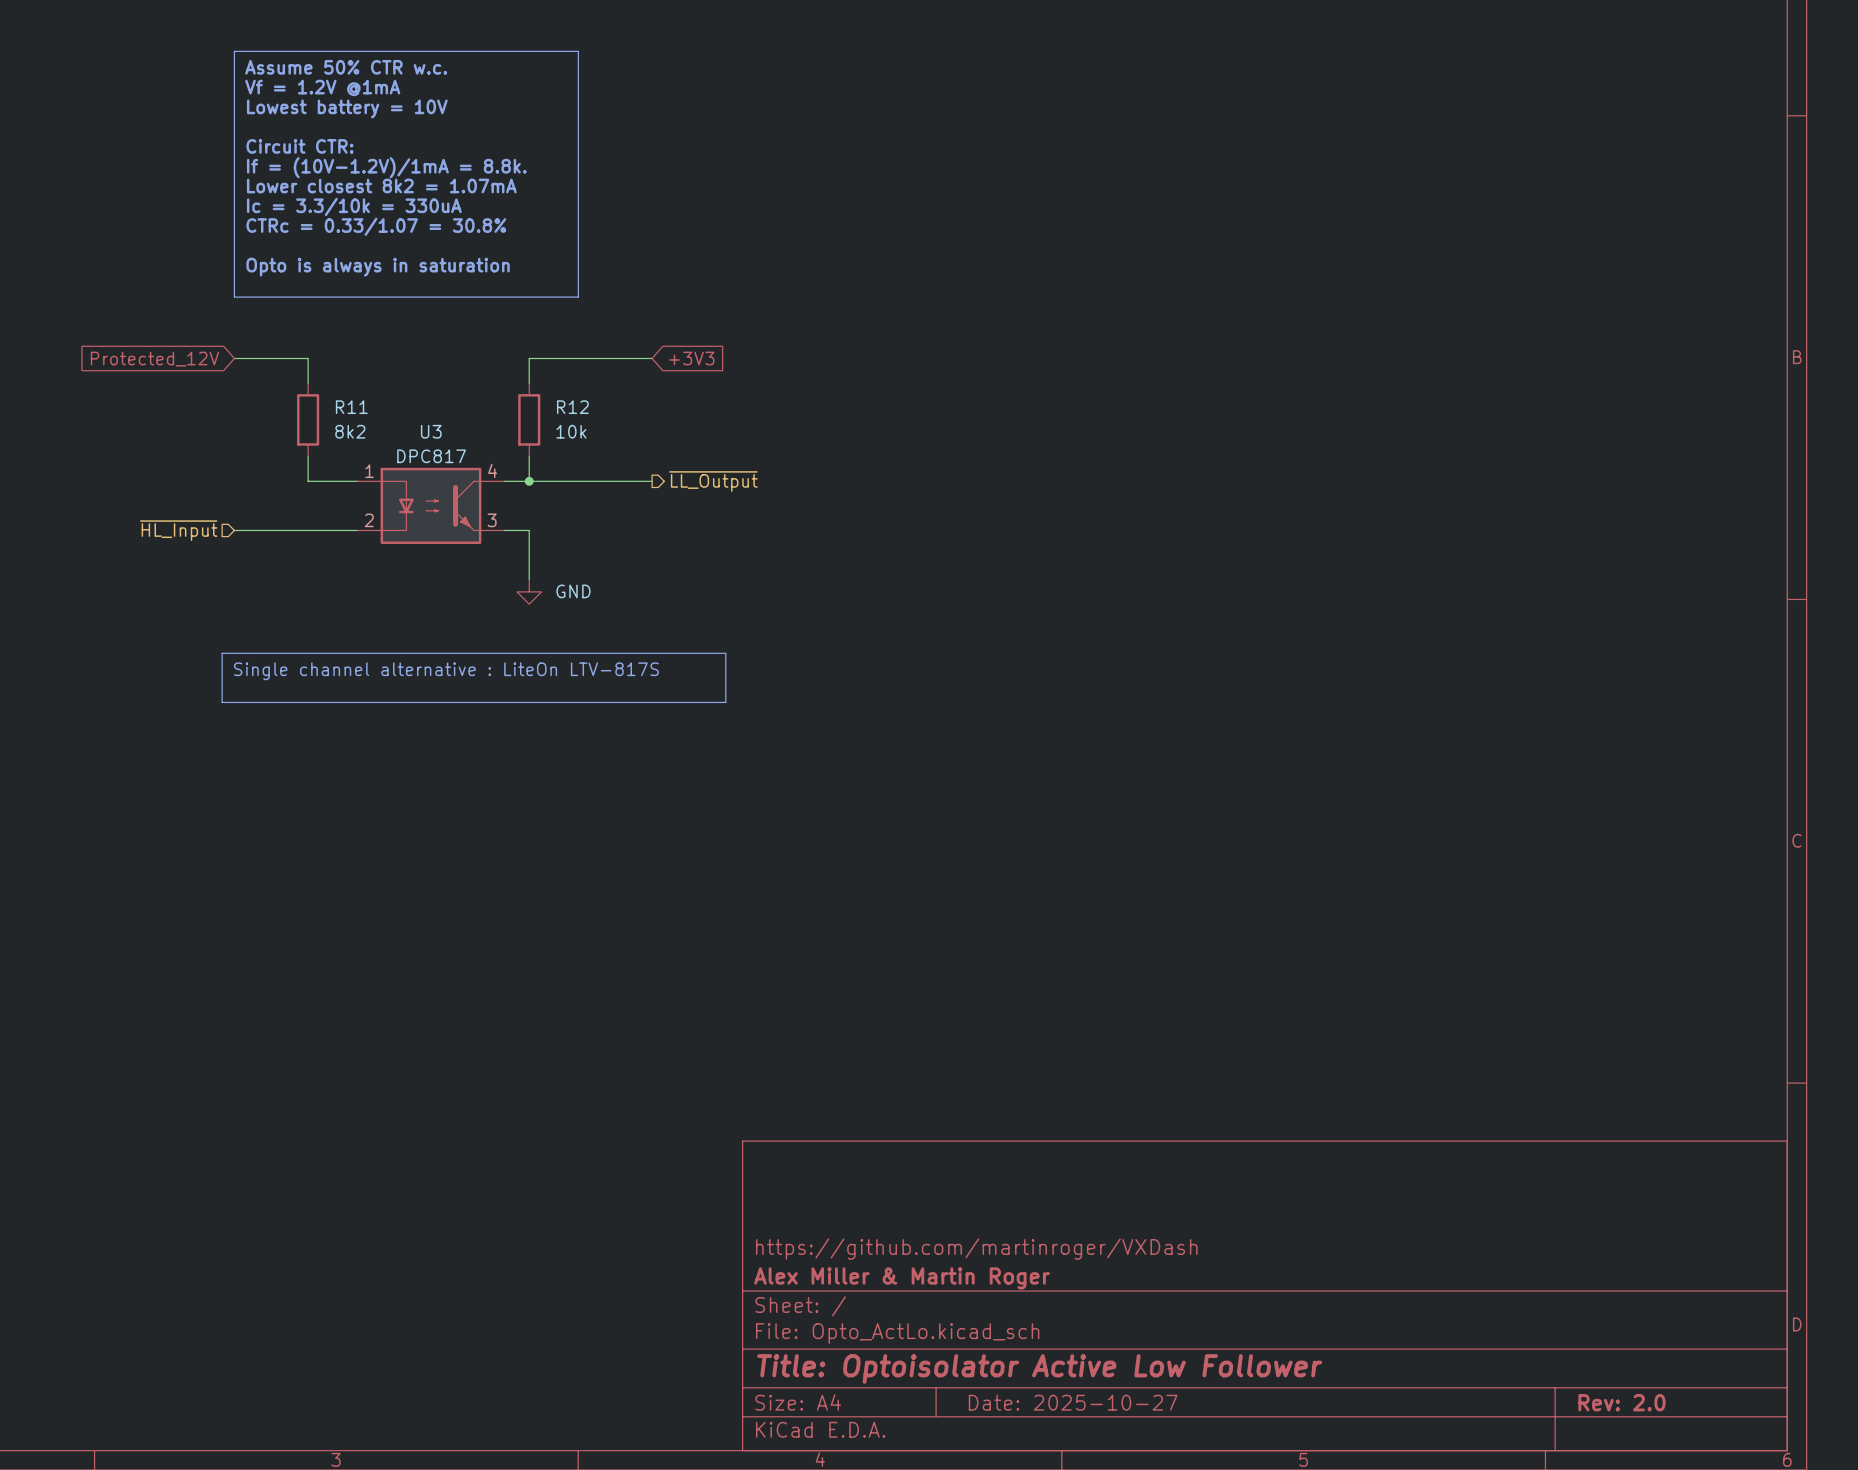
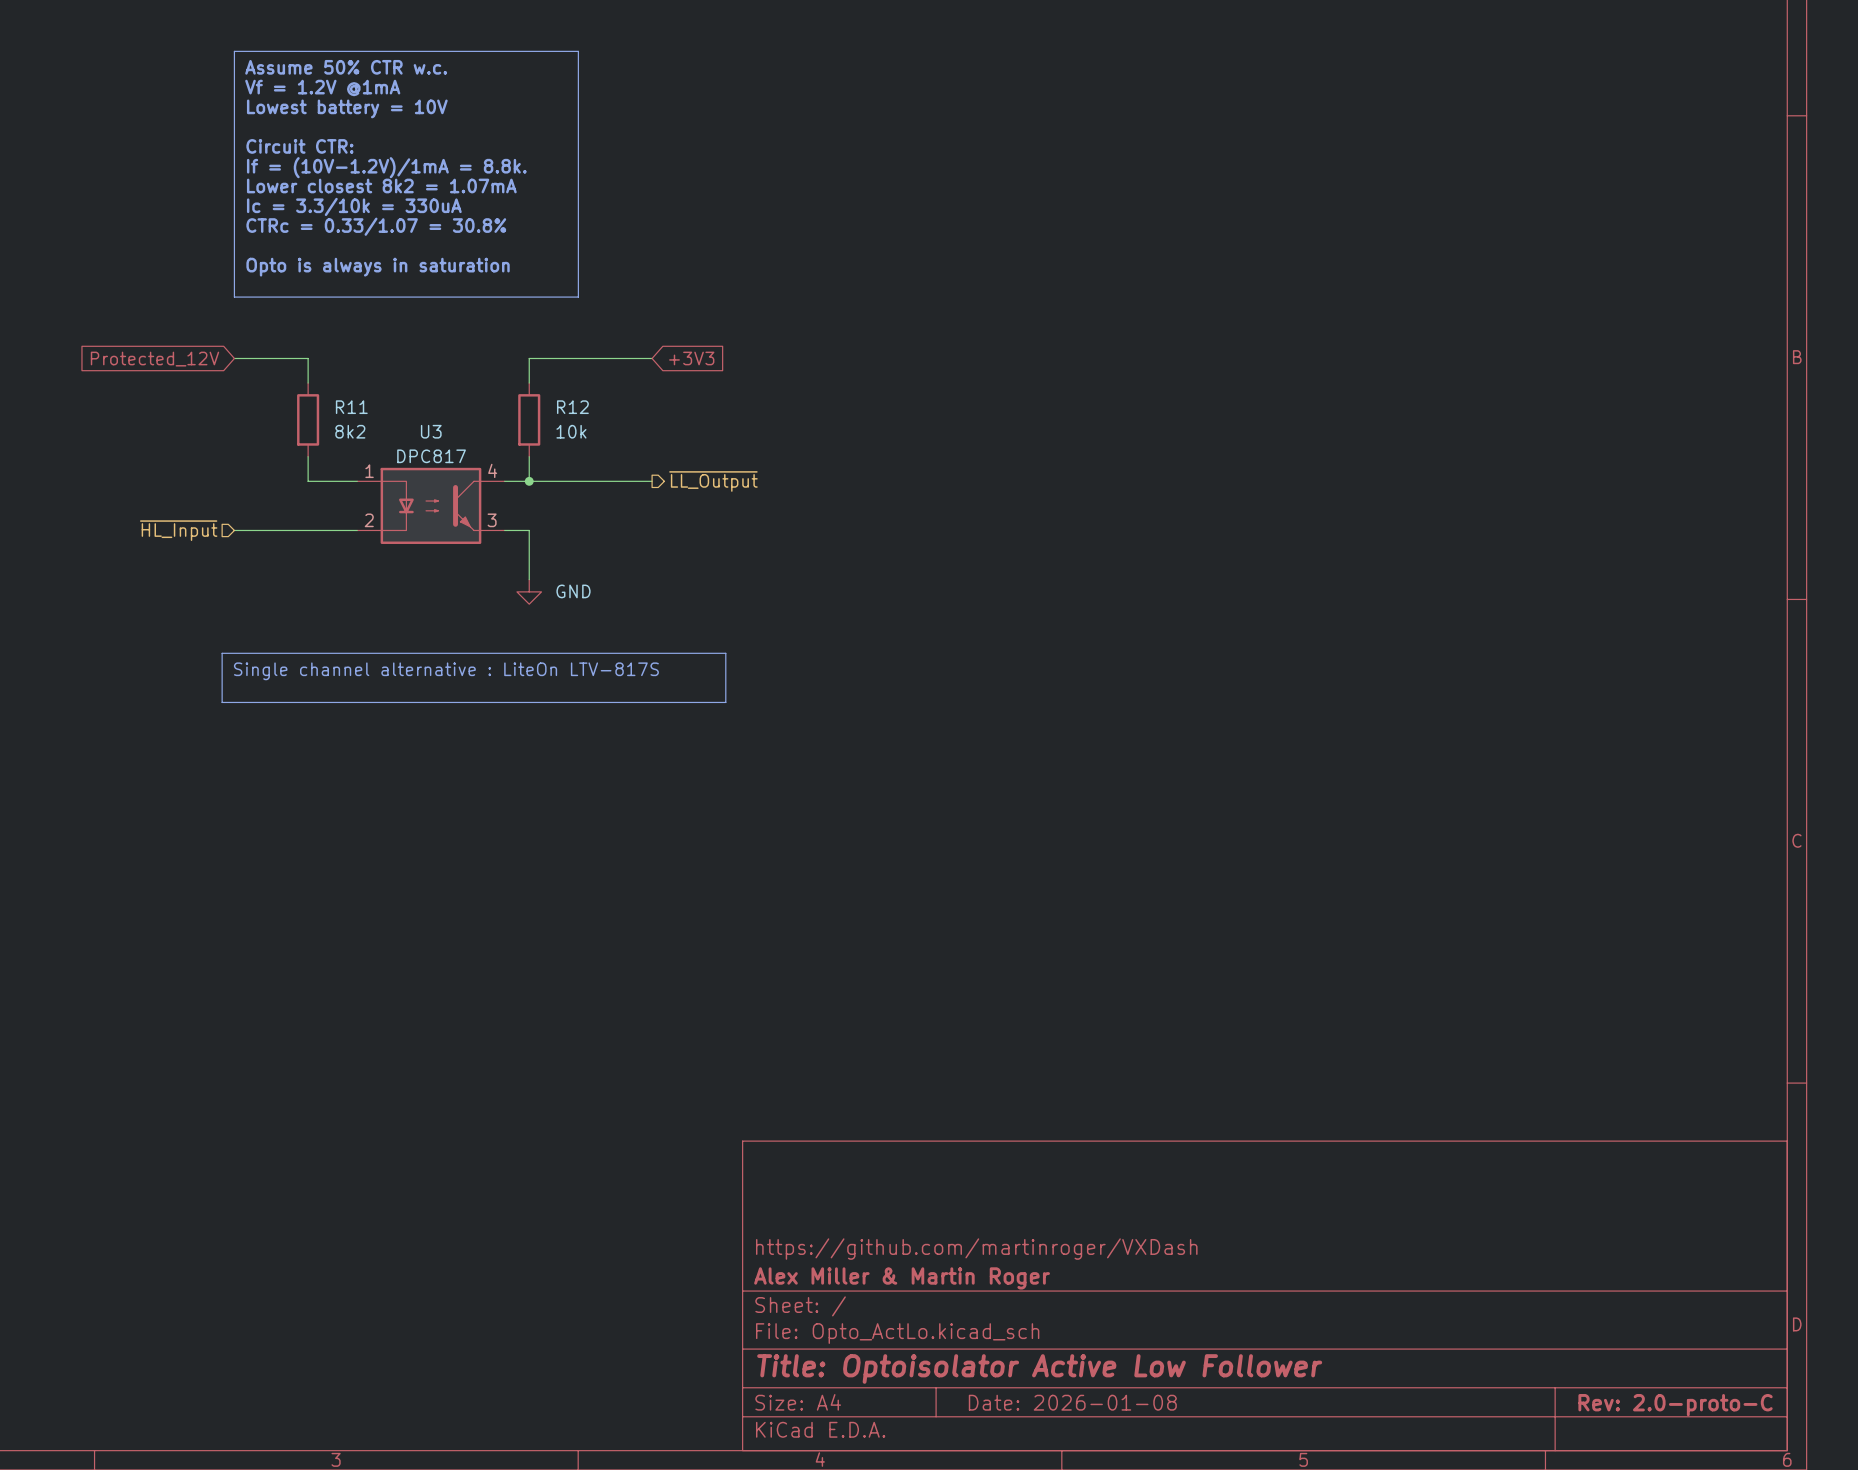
title block: Date: 2025-10-27 (1073, 1402) -> Date: 2026-01-08 (1072, 1402)
title block: Rev: 2.0 (1621, 1402) -> Rev: 2.0-proto-C (1675, 1405)

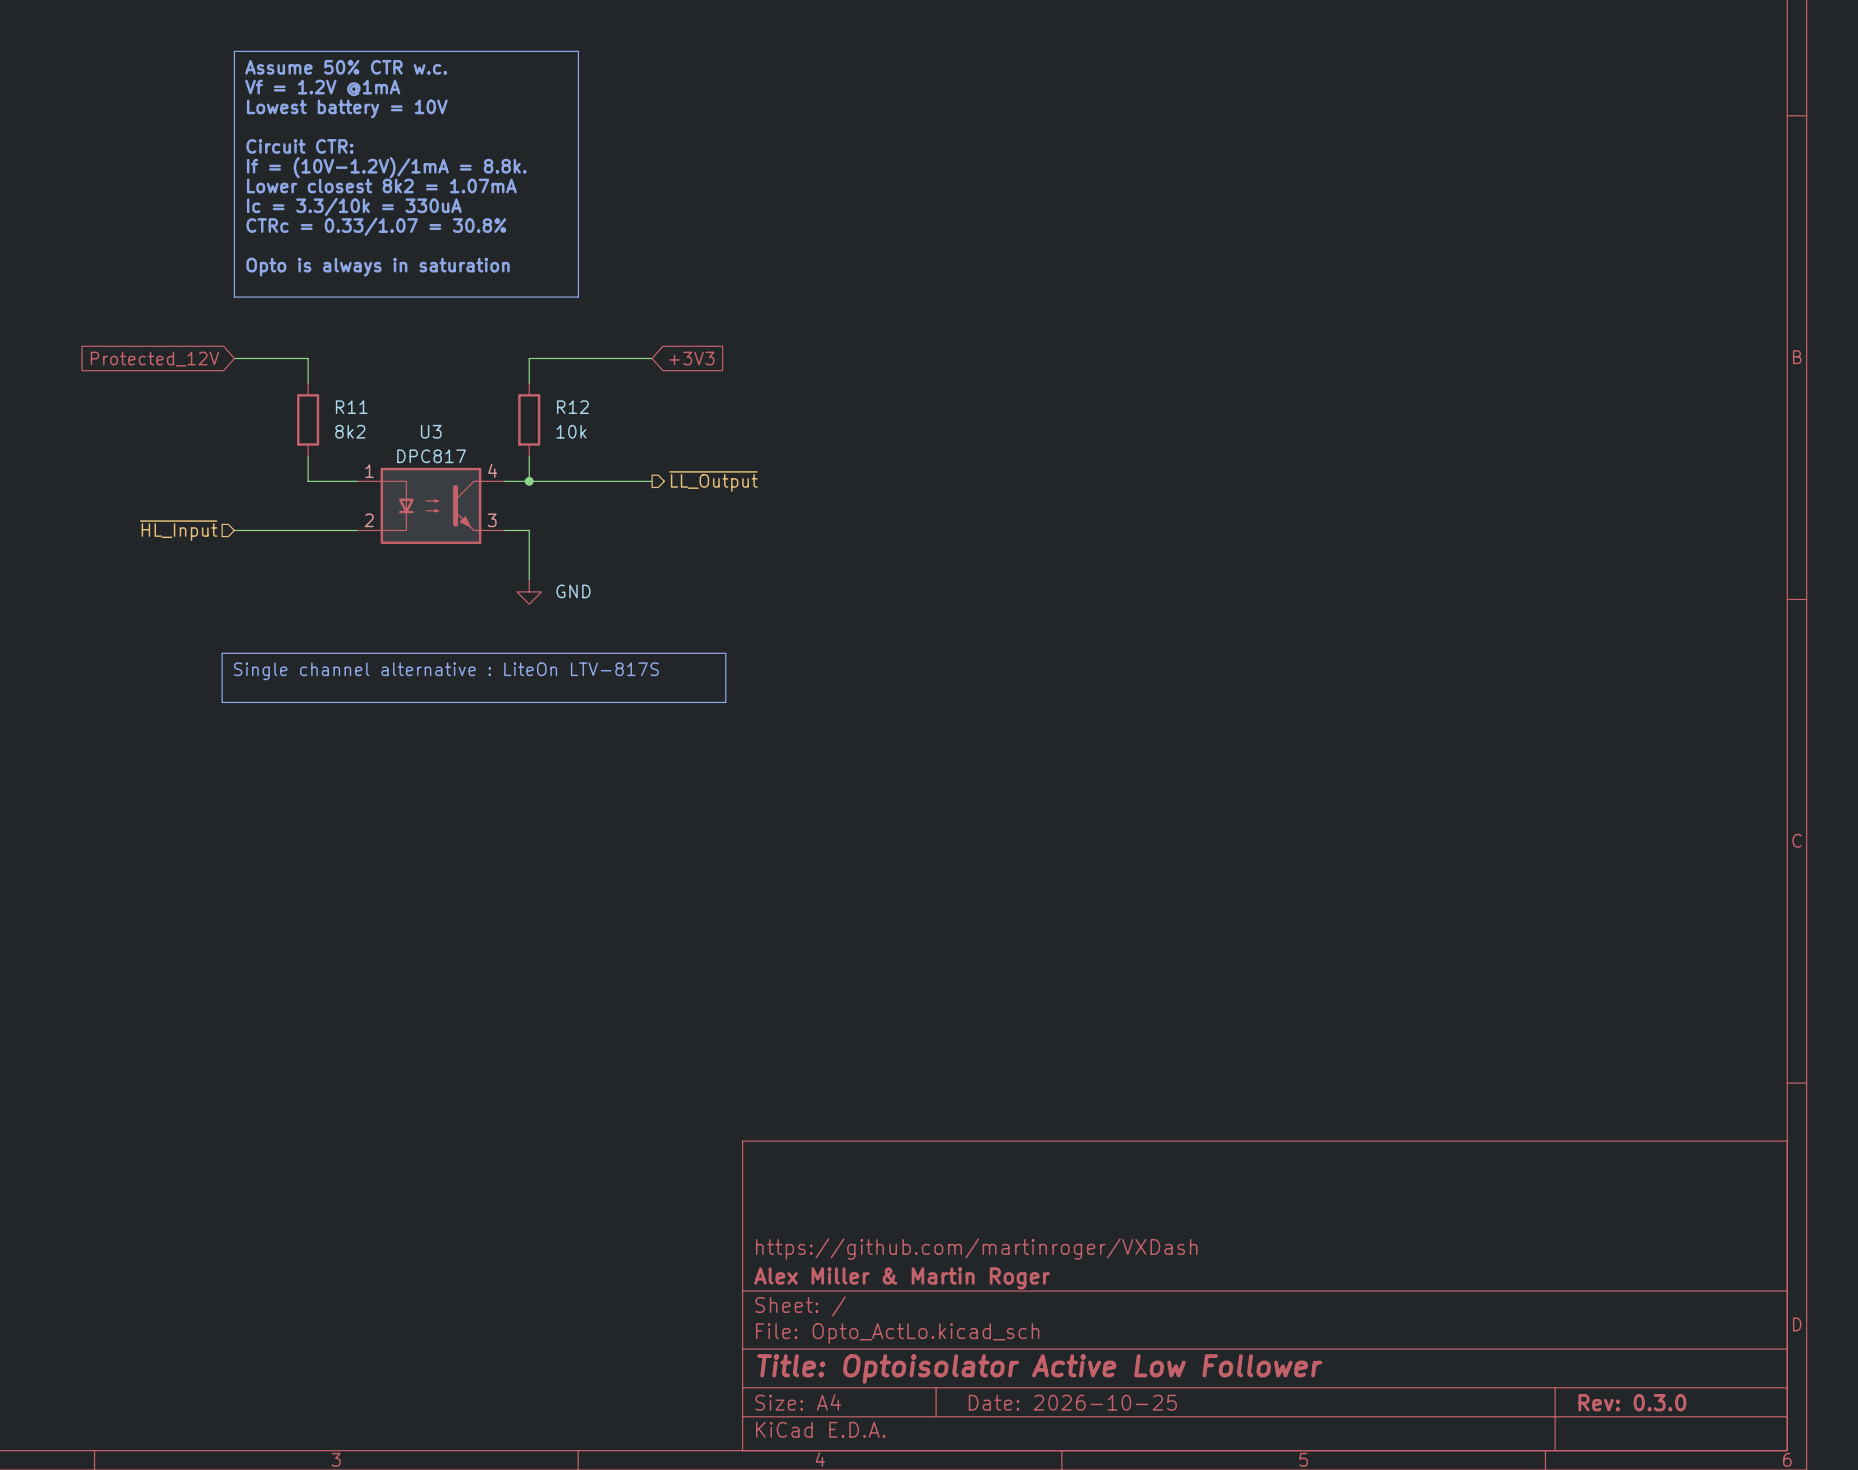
title block: Date: 2026-01-08 (1072, 1402) -> Date: 2026-10-25 (1072, 1402)
title block: Rev: 2.0-proto-C (1675, 1405) -> Rev: 0.3.0 (1632, 1402)

